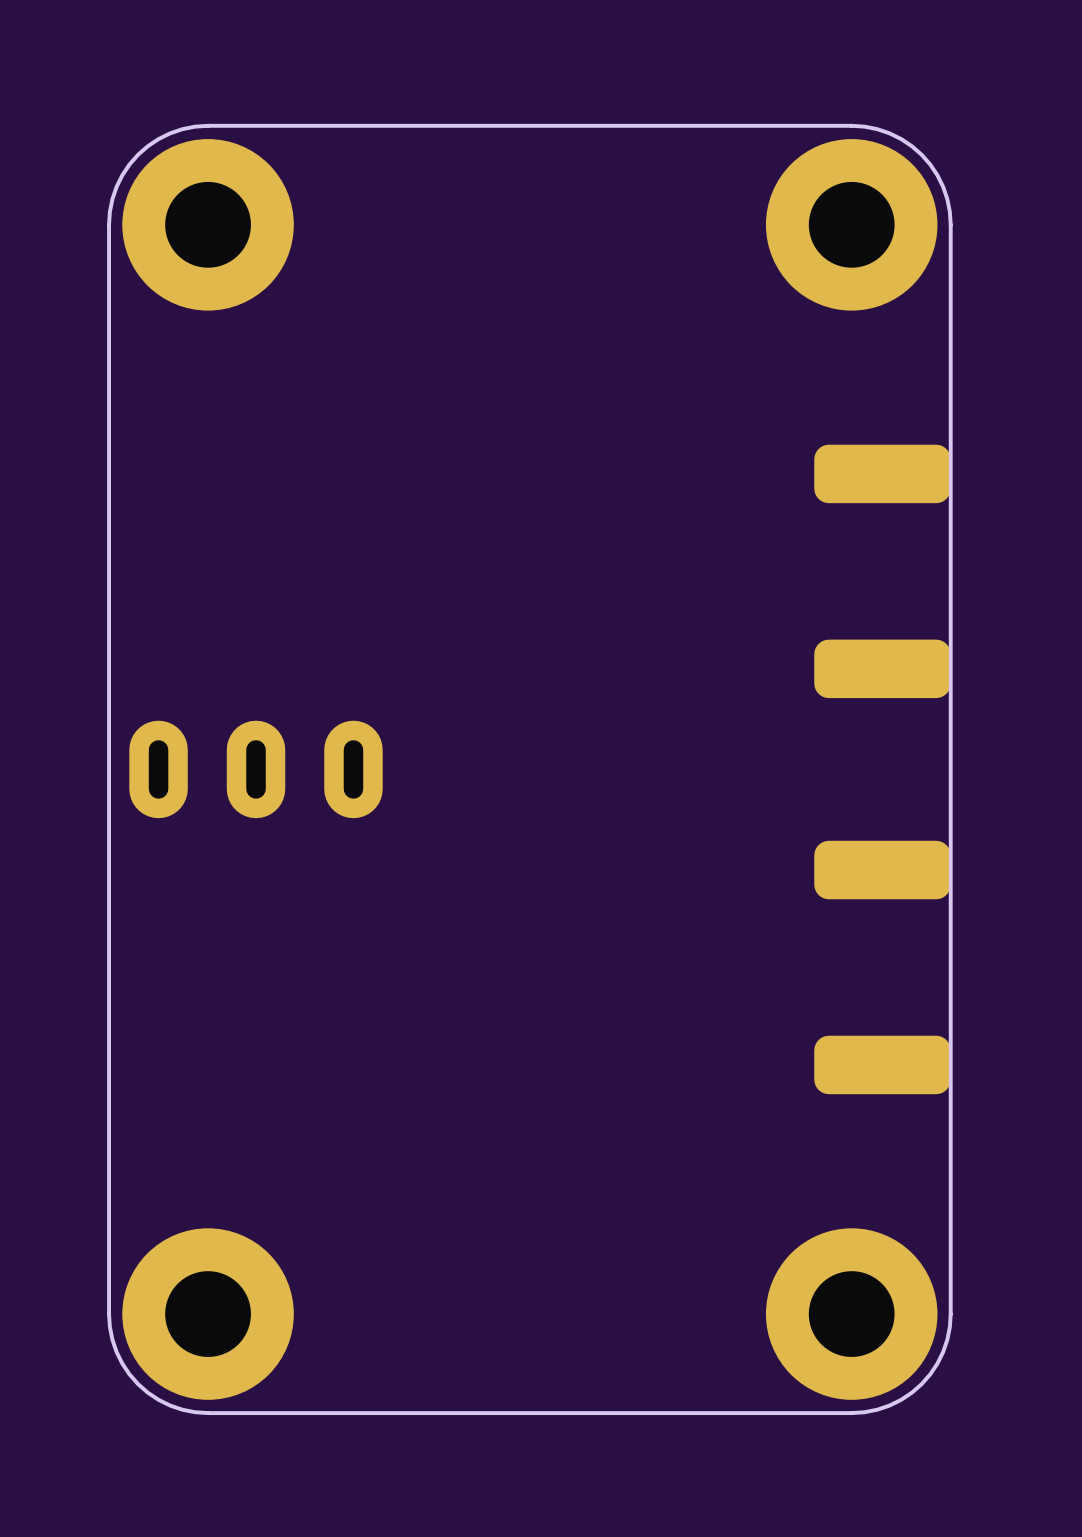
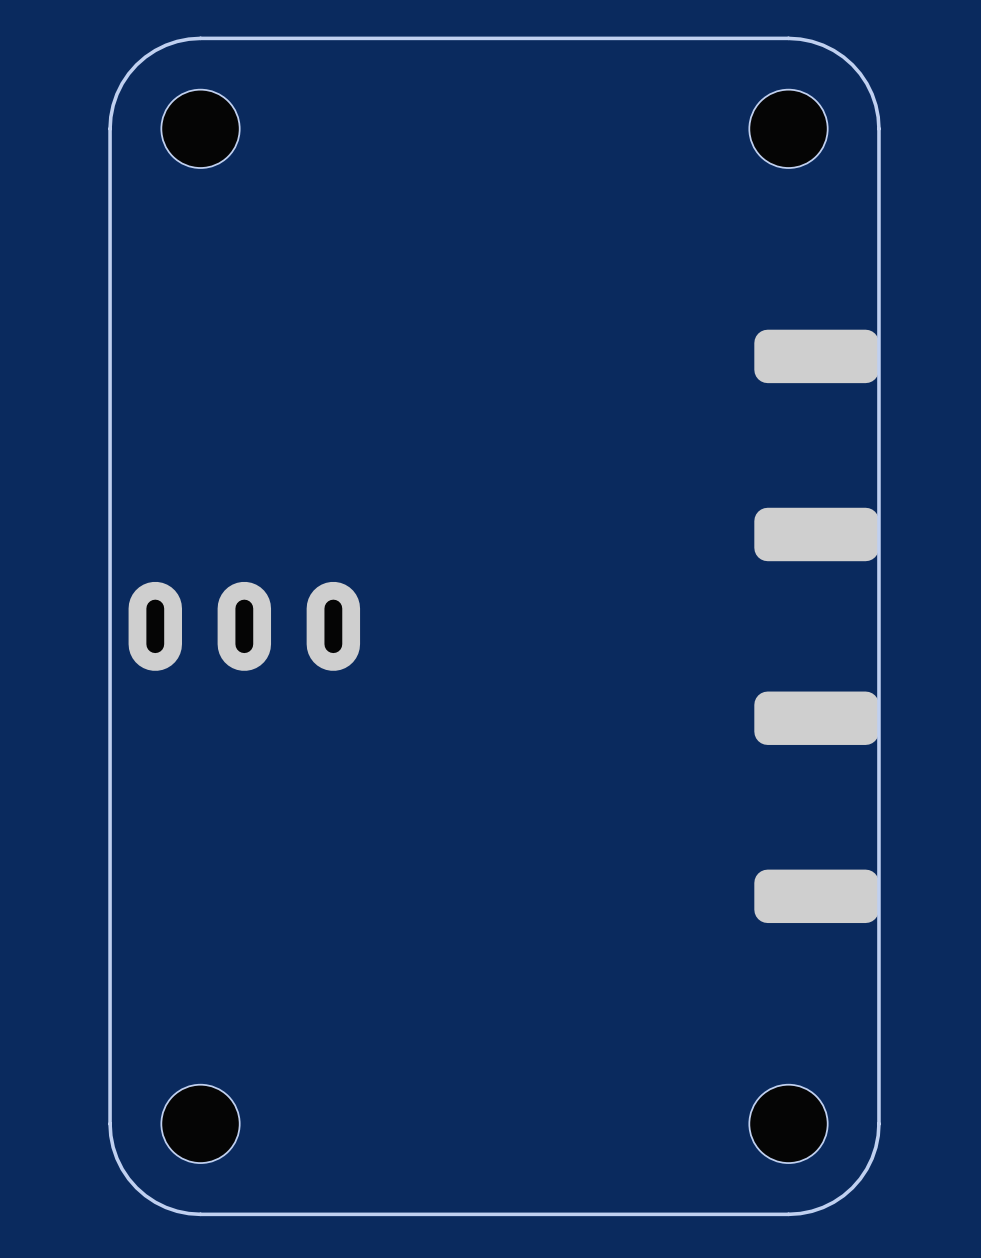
part footprint: [122, 139, 294, 311] -> [161, 89, 240, 169]
part footprint: [765, 139, 938, 311] -> [749, 89, 828, 169]
part footprint: [122, 1228, 294, 1400] -> [161, 1084, 240, 1164]
part footprint: [765, 1228, 938, 1400] -> [749, 1084, 828, 1164]

